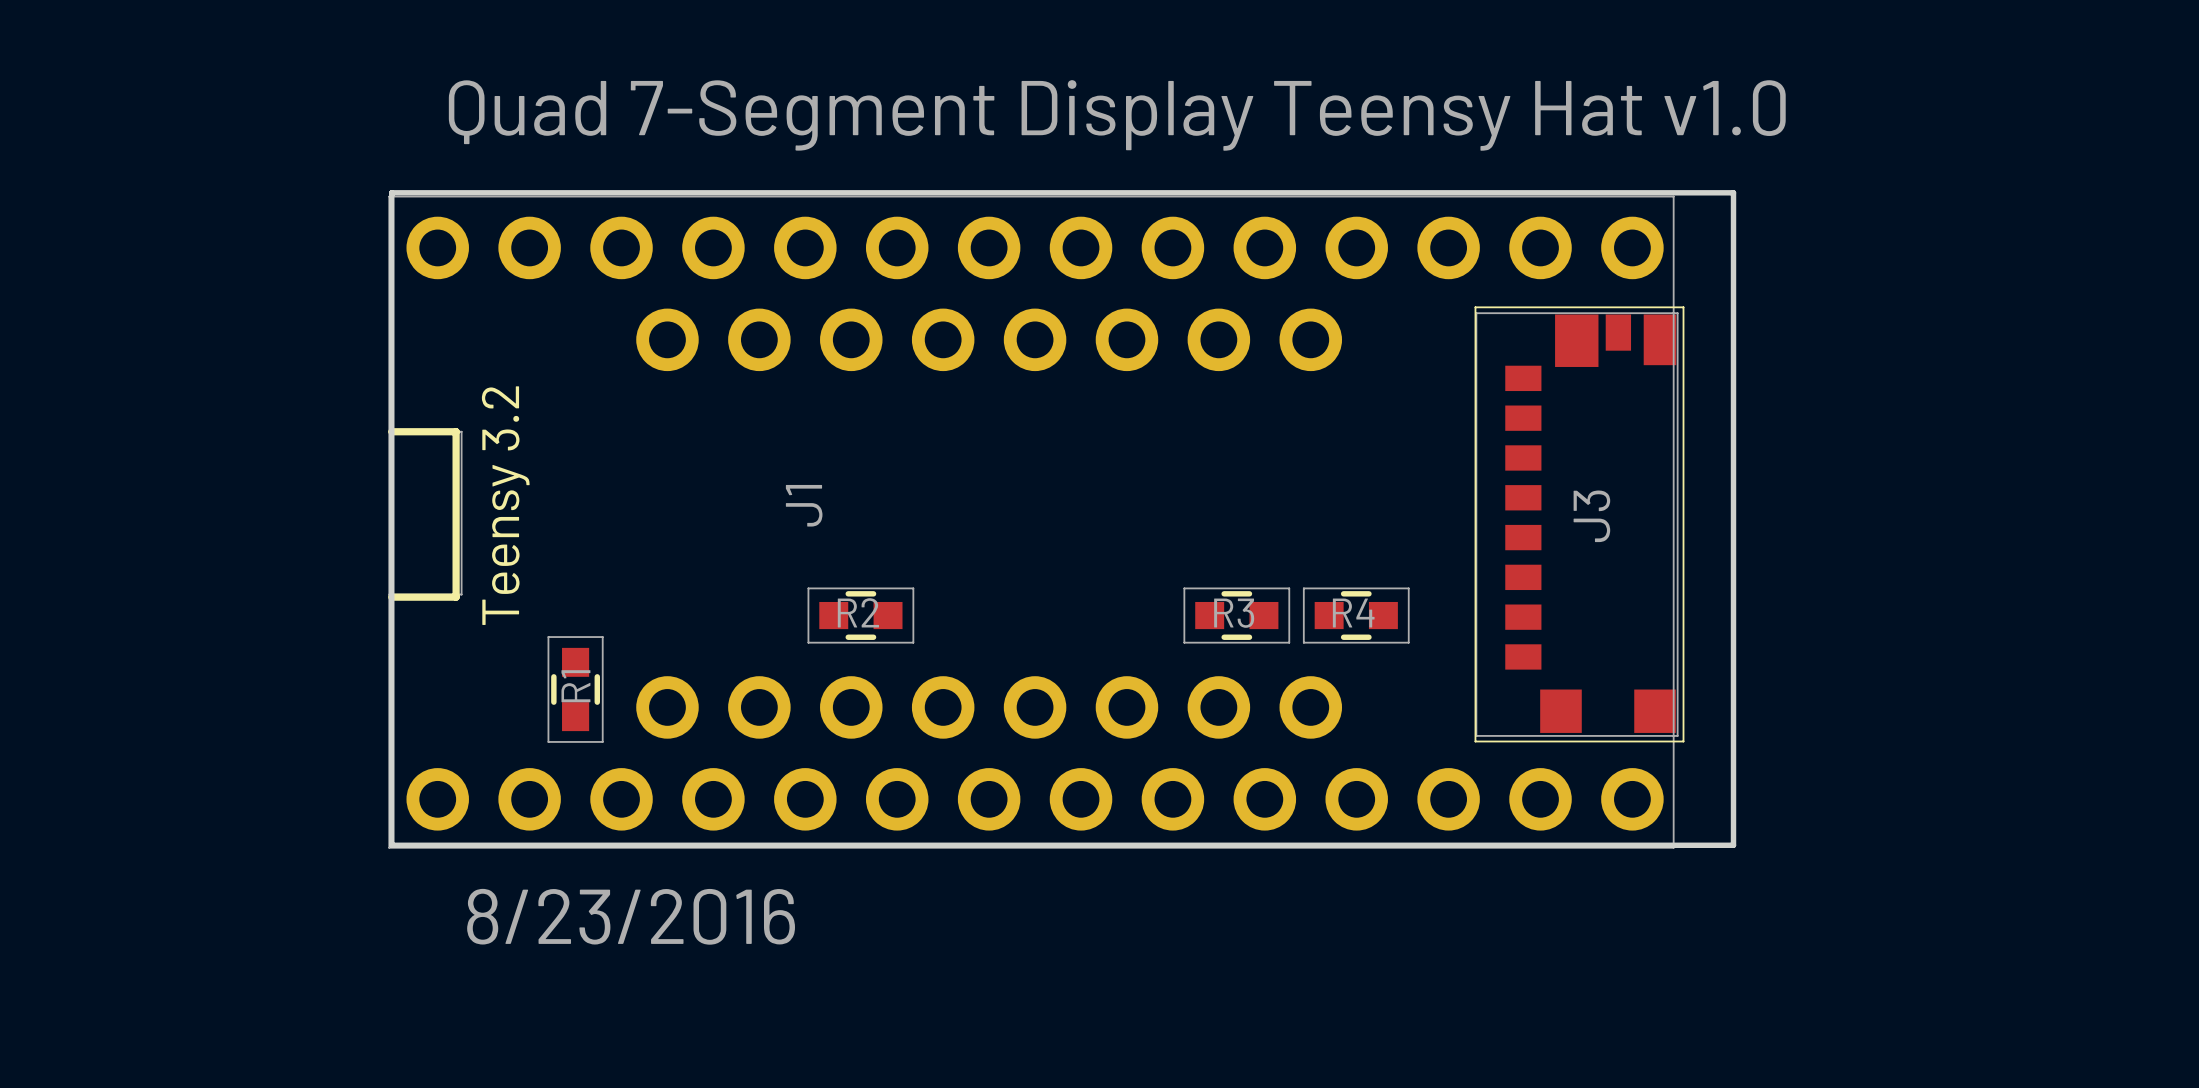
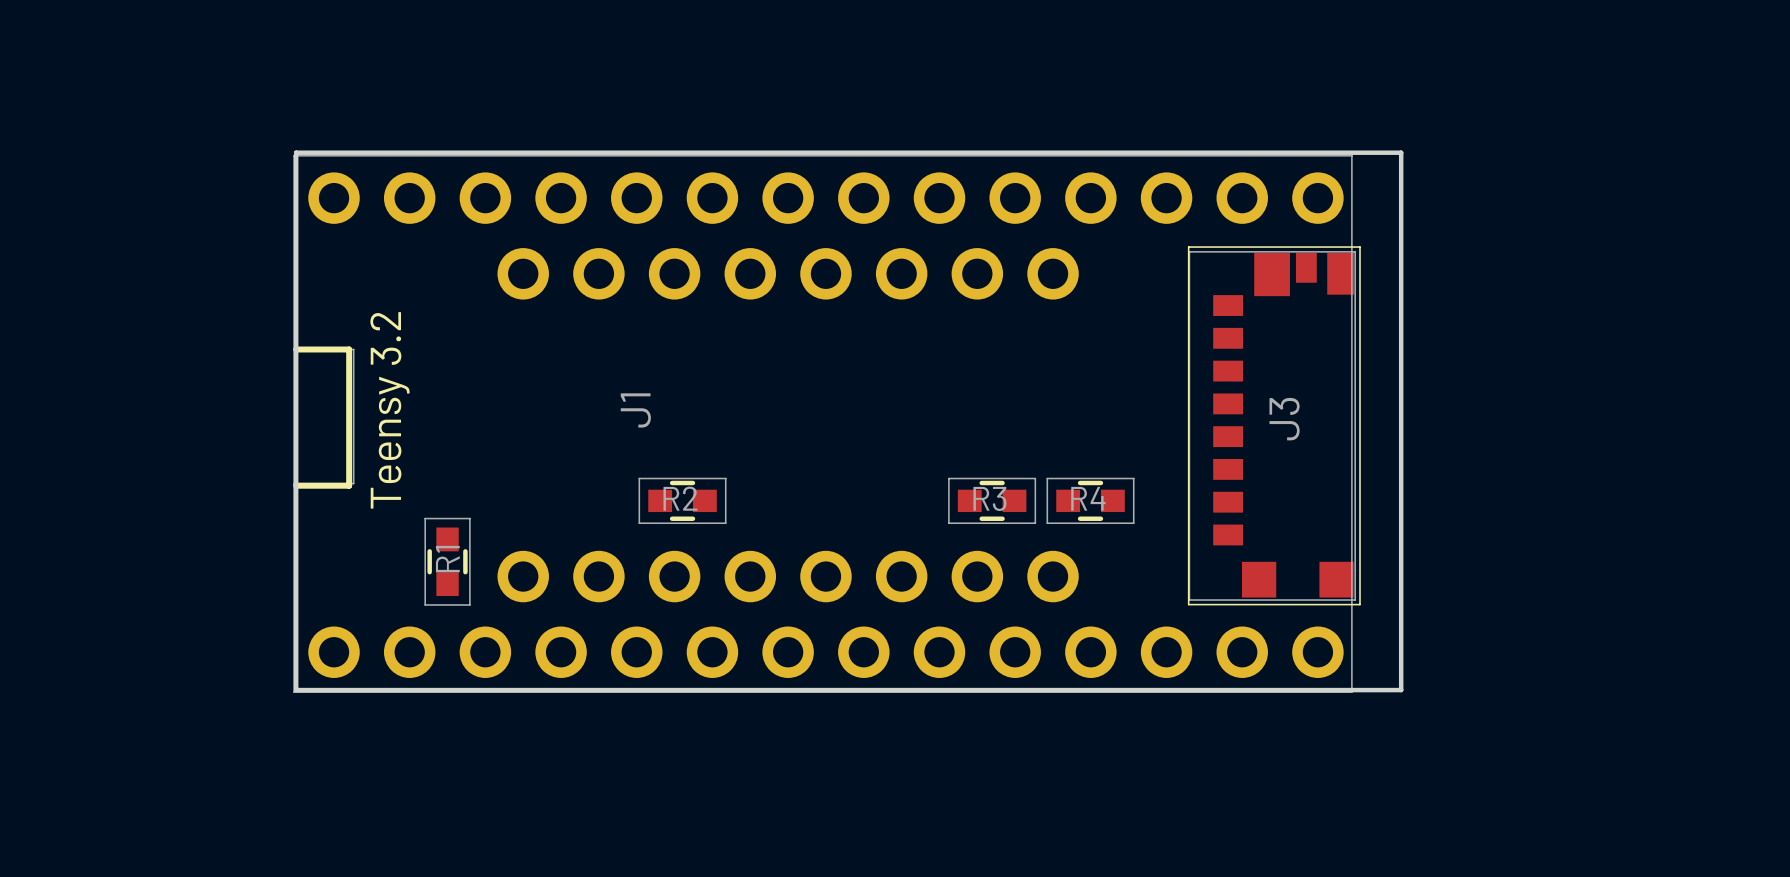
text: Quad 7-Segment Display Teensy Hat v1.0 (1117, 115) -> none
text: 8/23/2016 (631, 916) -> none

